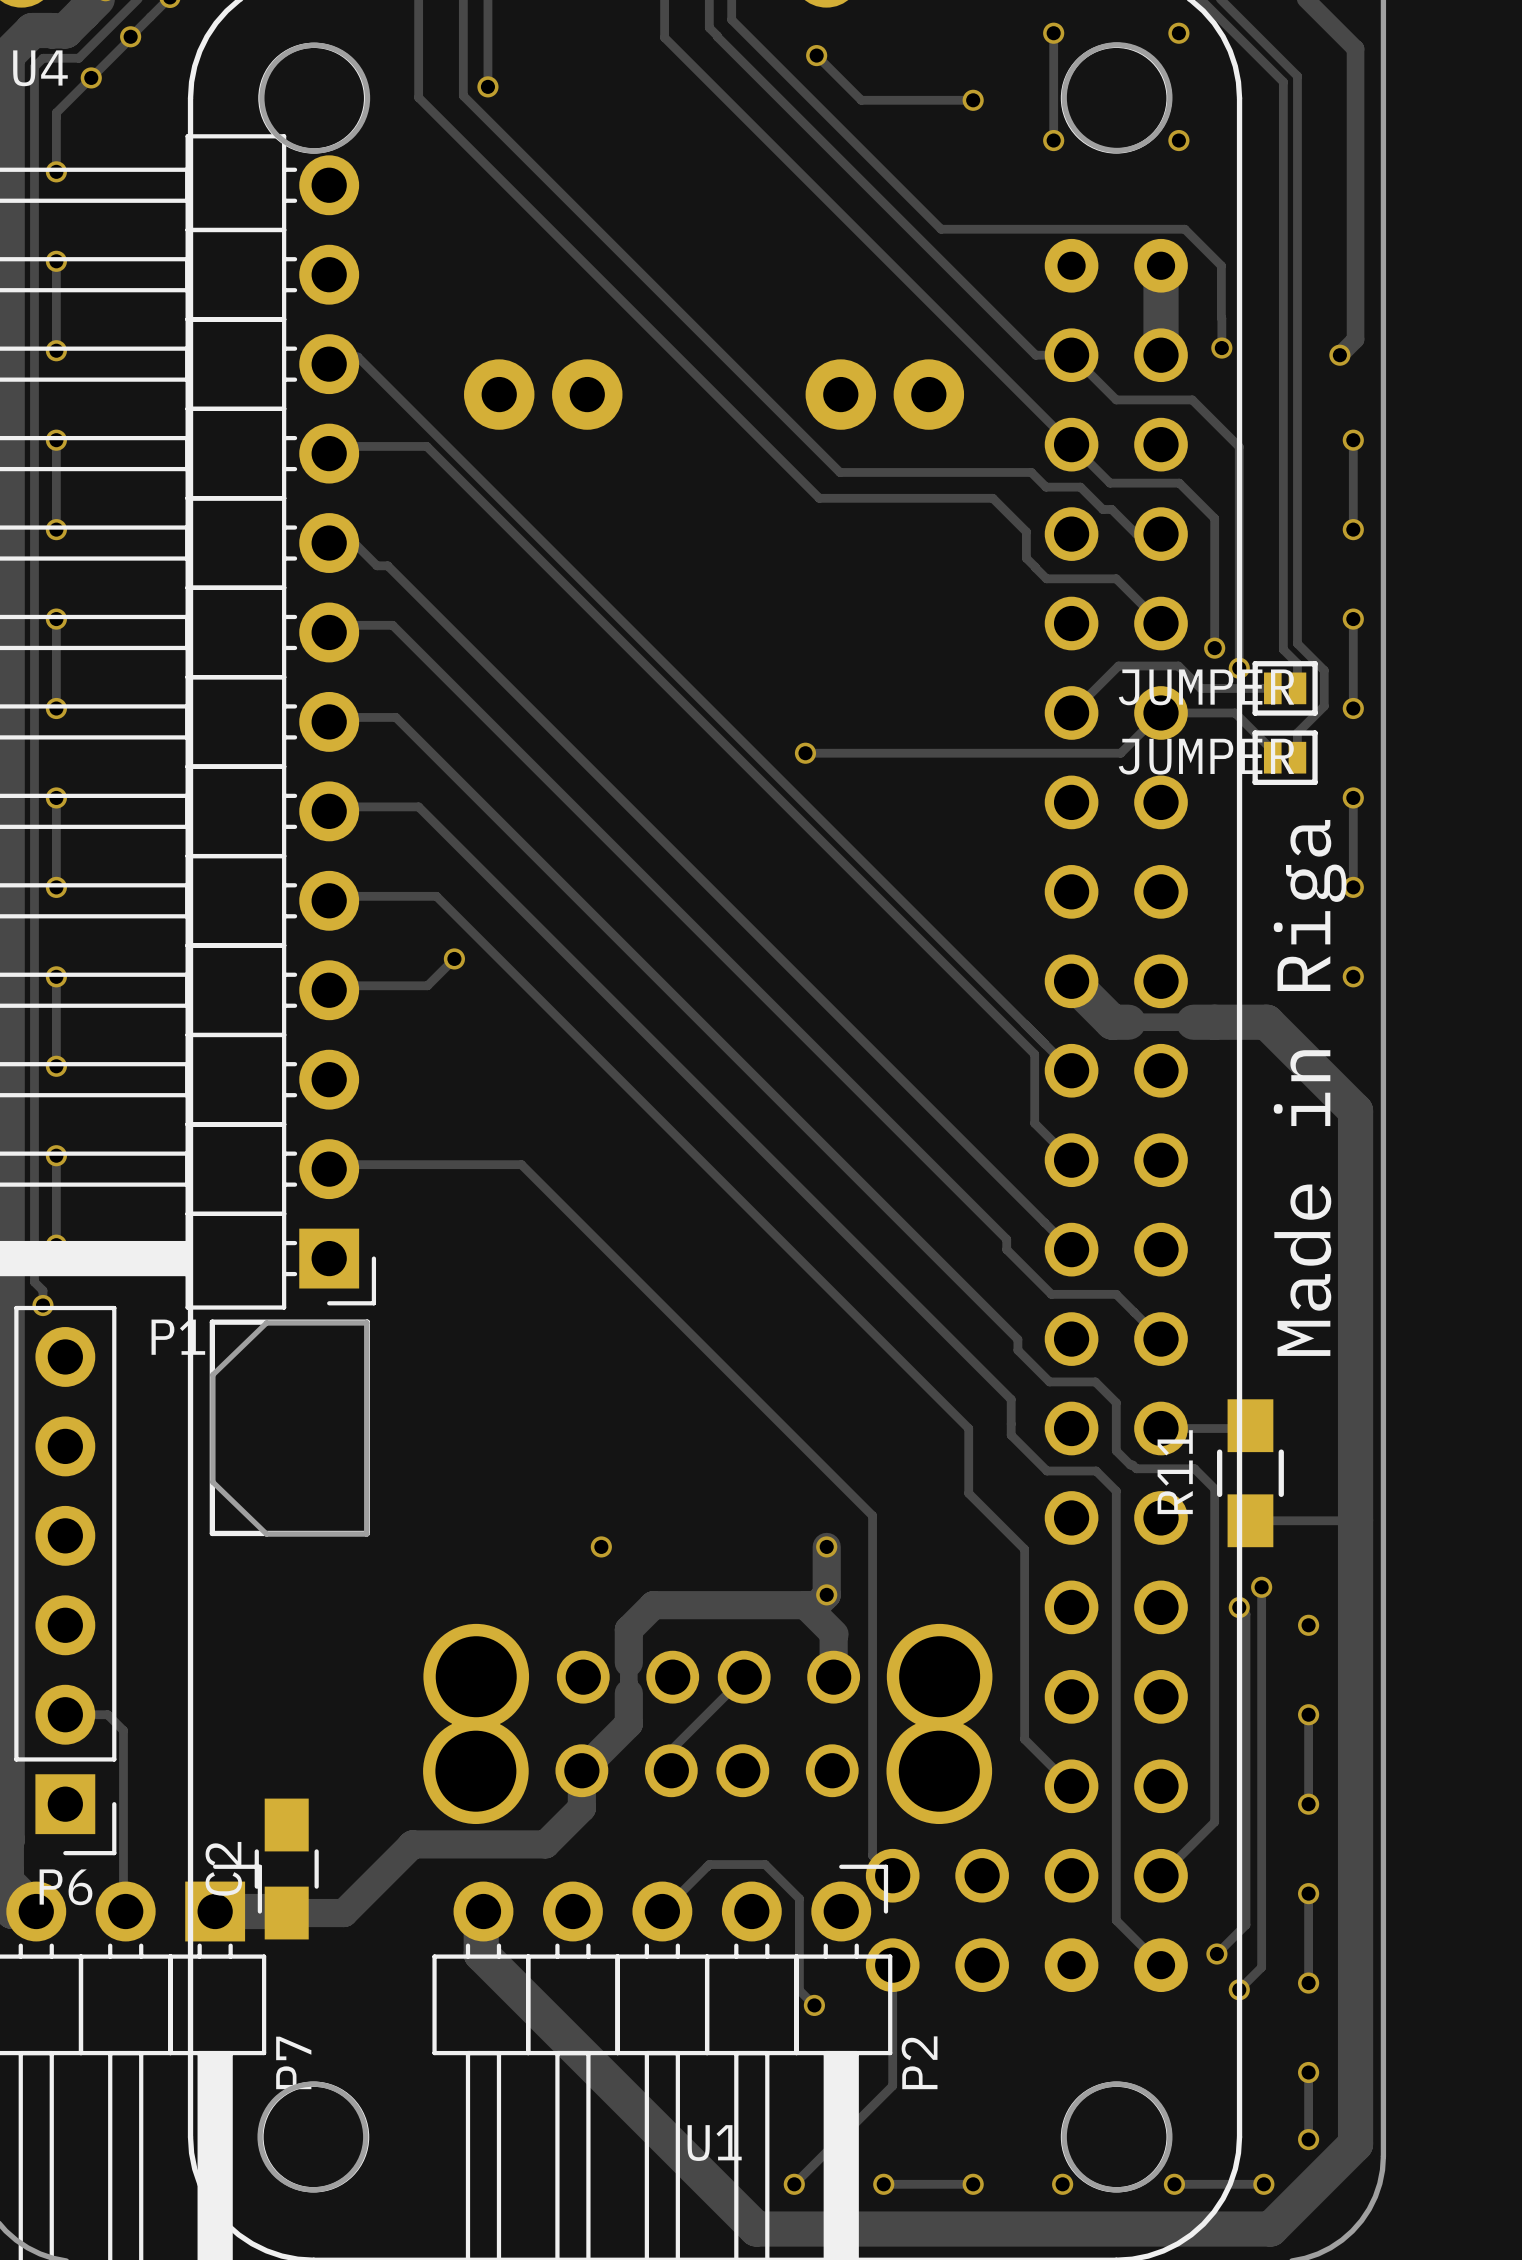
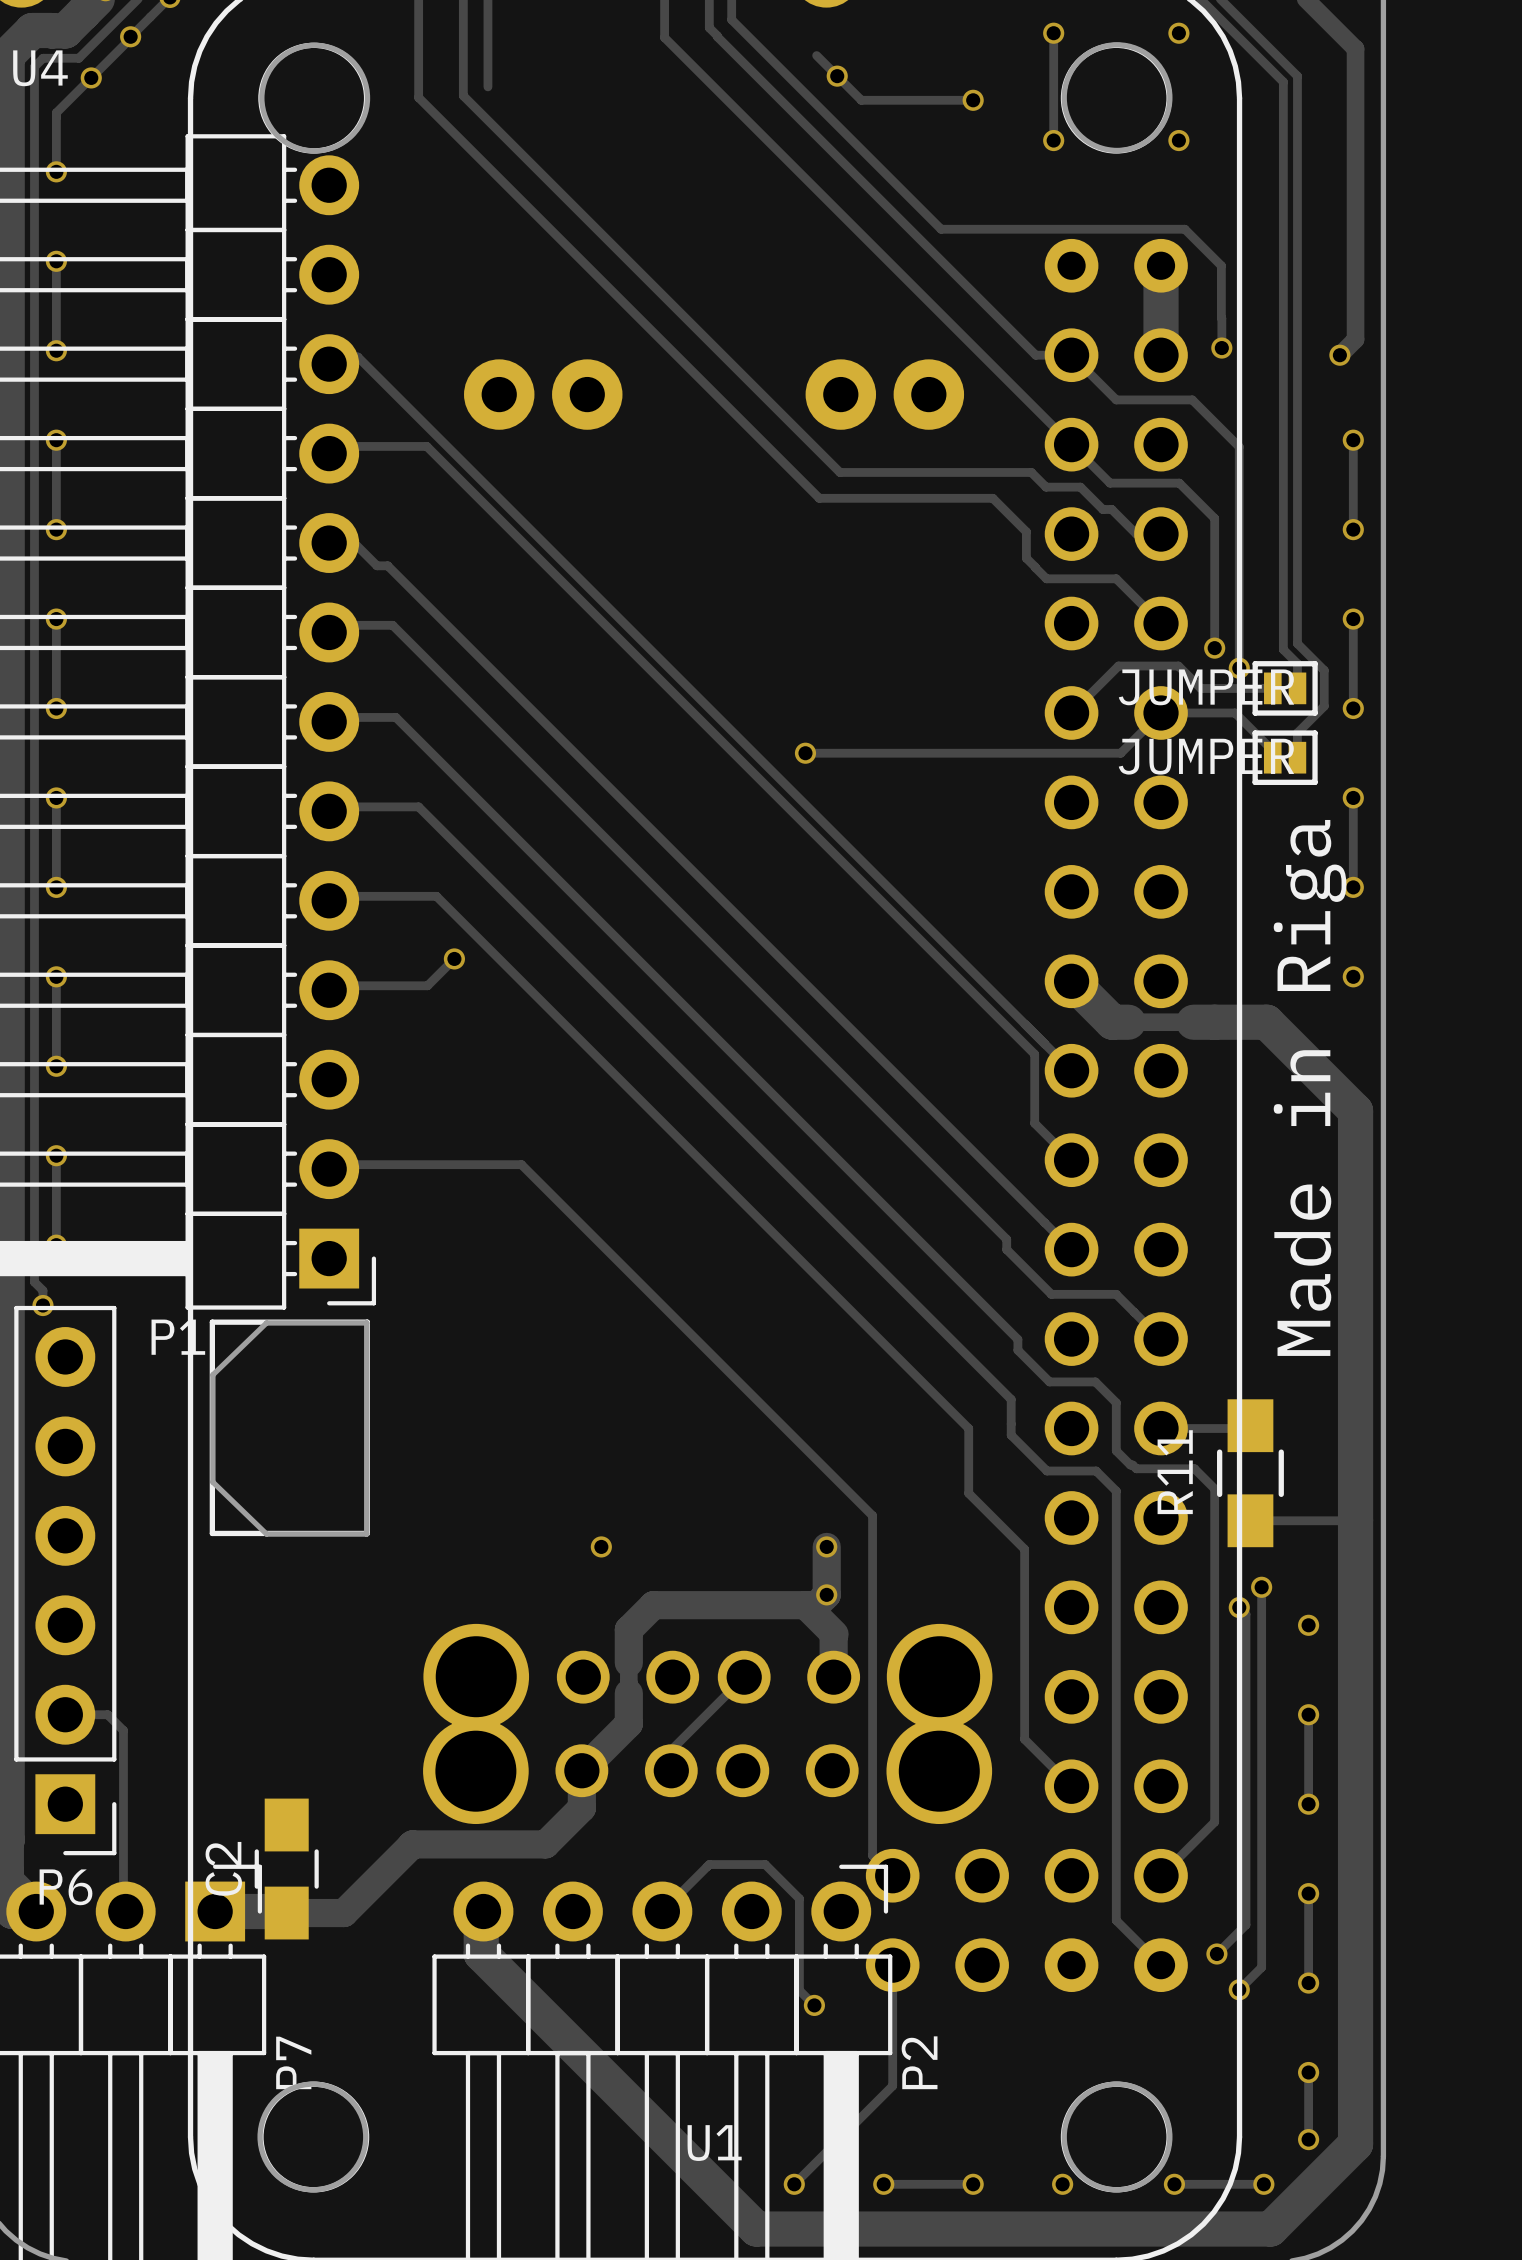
via position: (816, 55) -> (837, 76)
via: (487, 86) -> none

